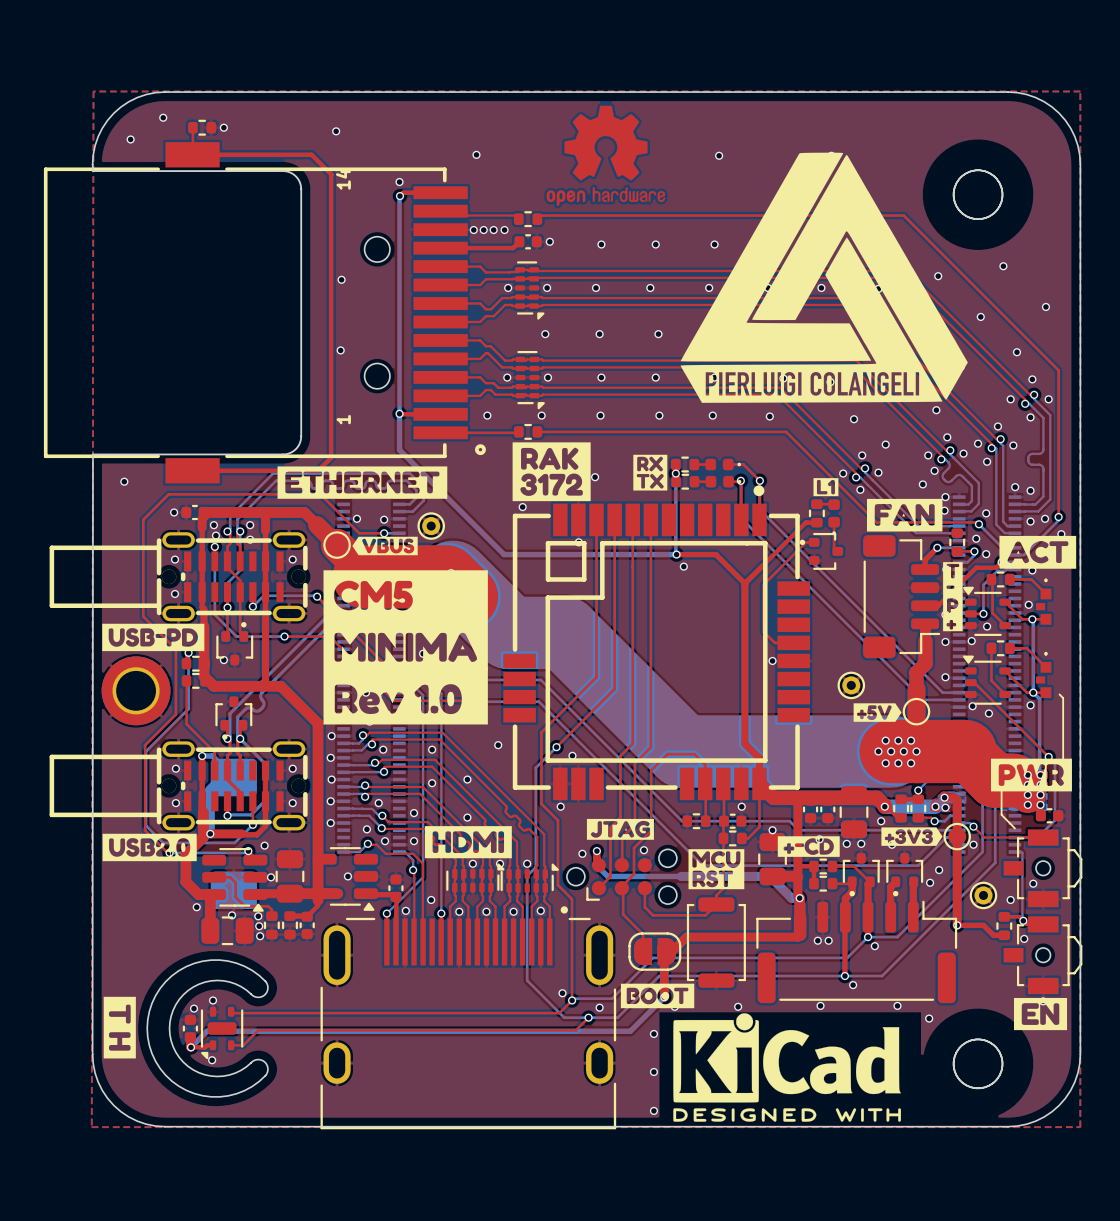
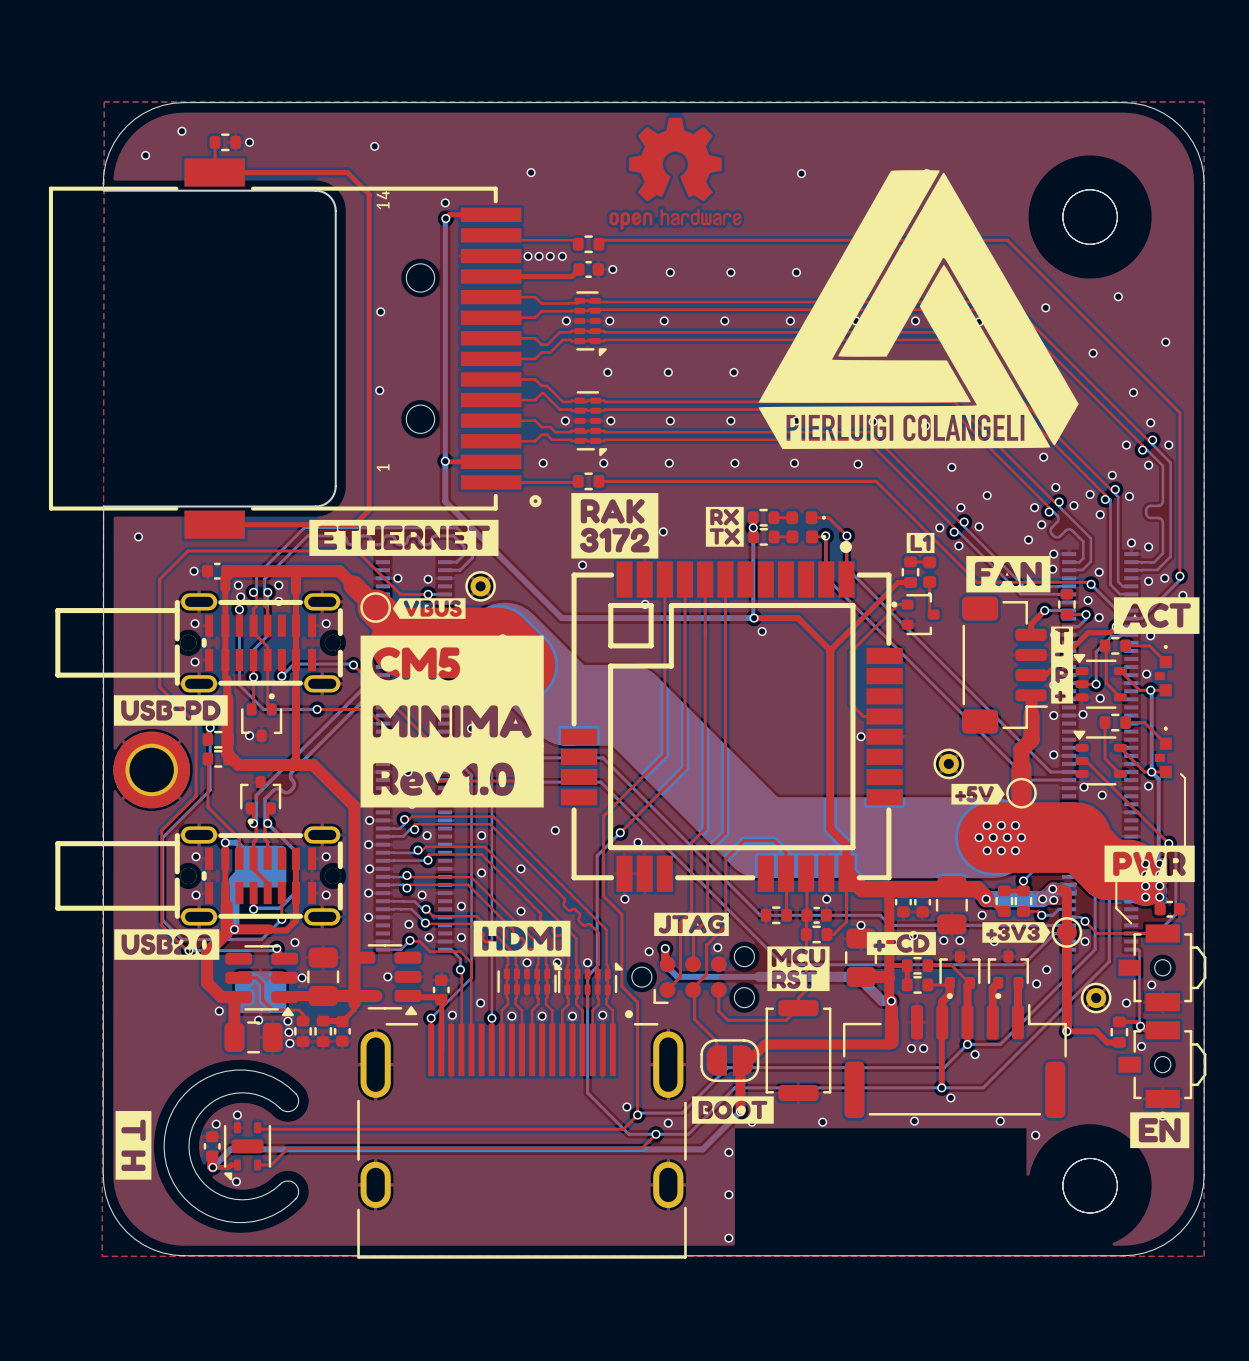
drawing: [673, 1013, 901, 1122] -> none

